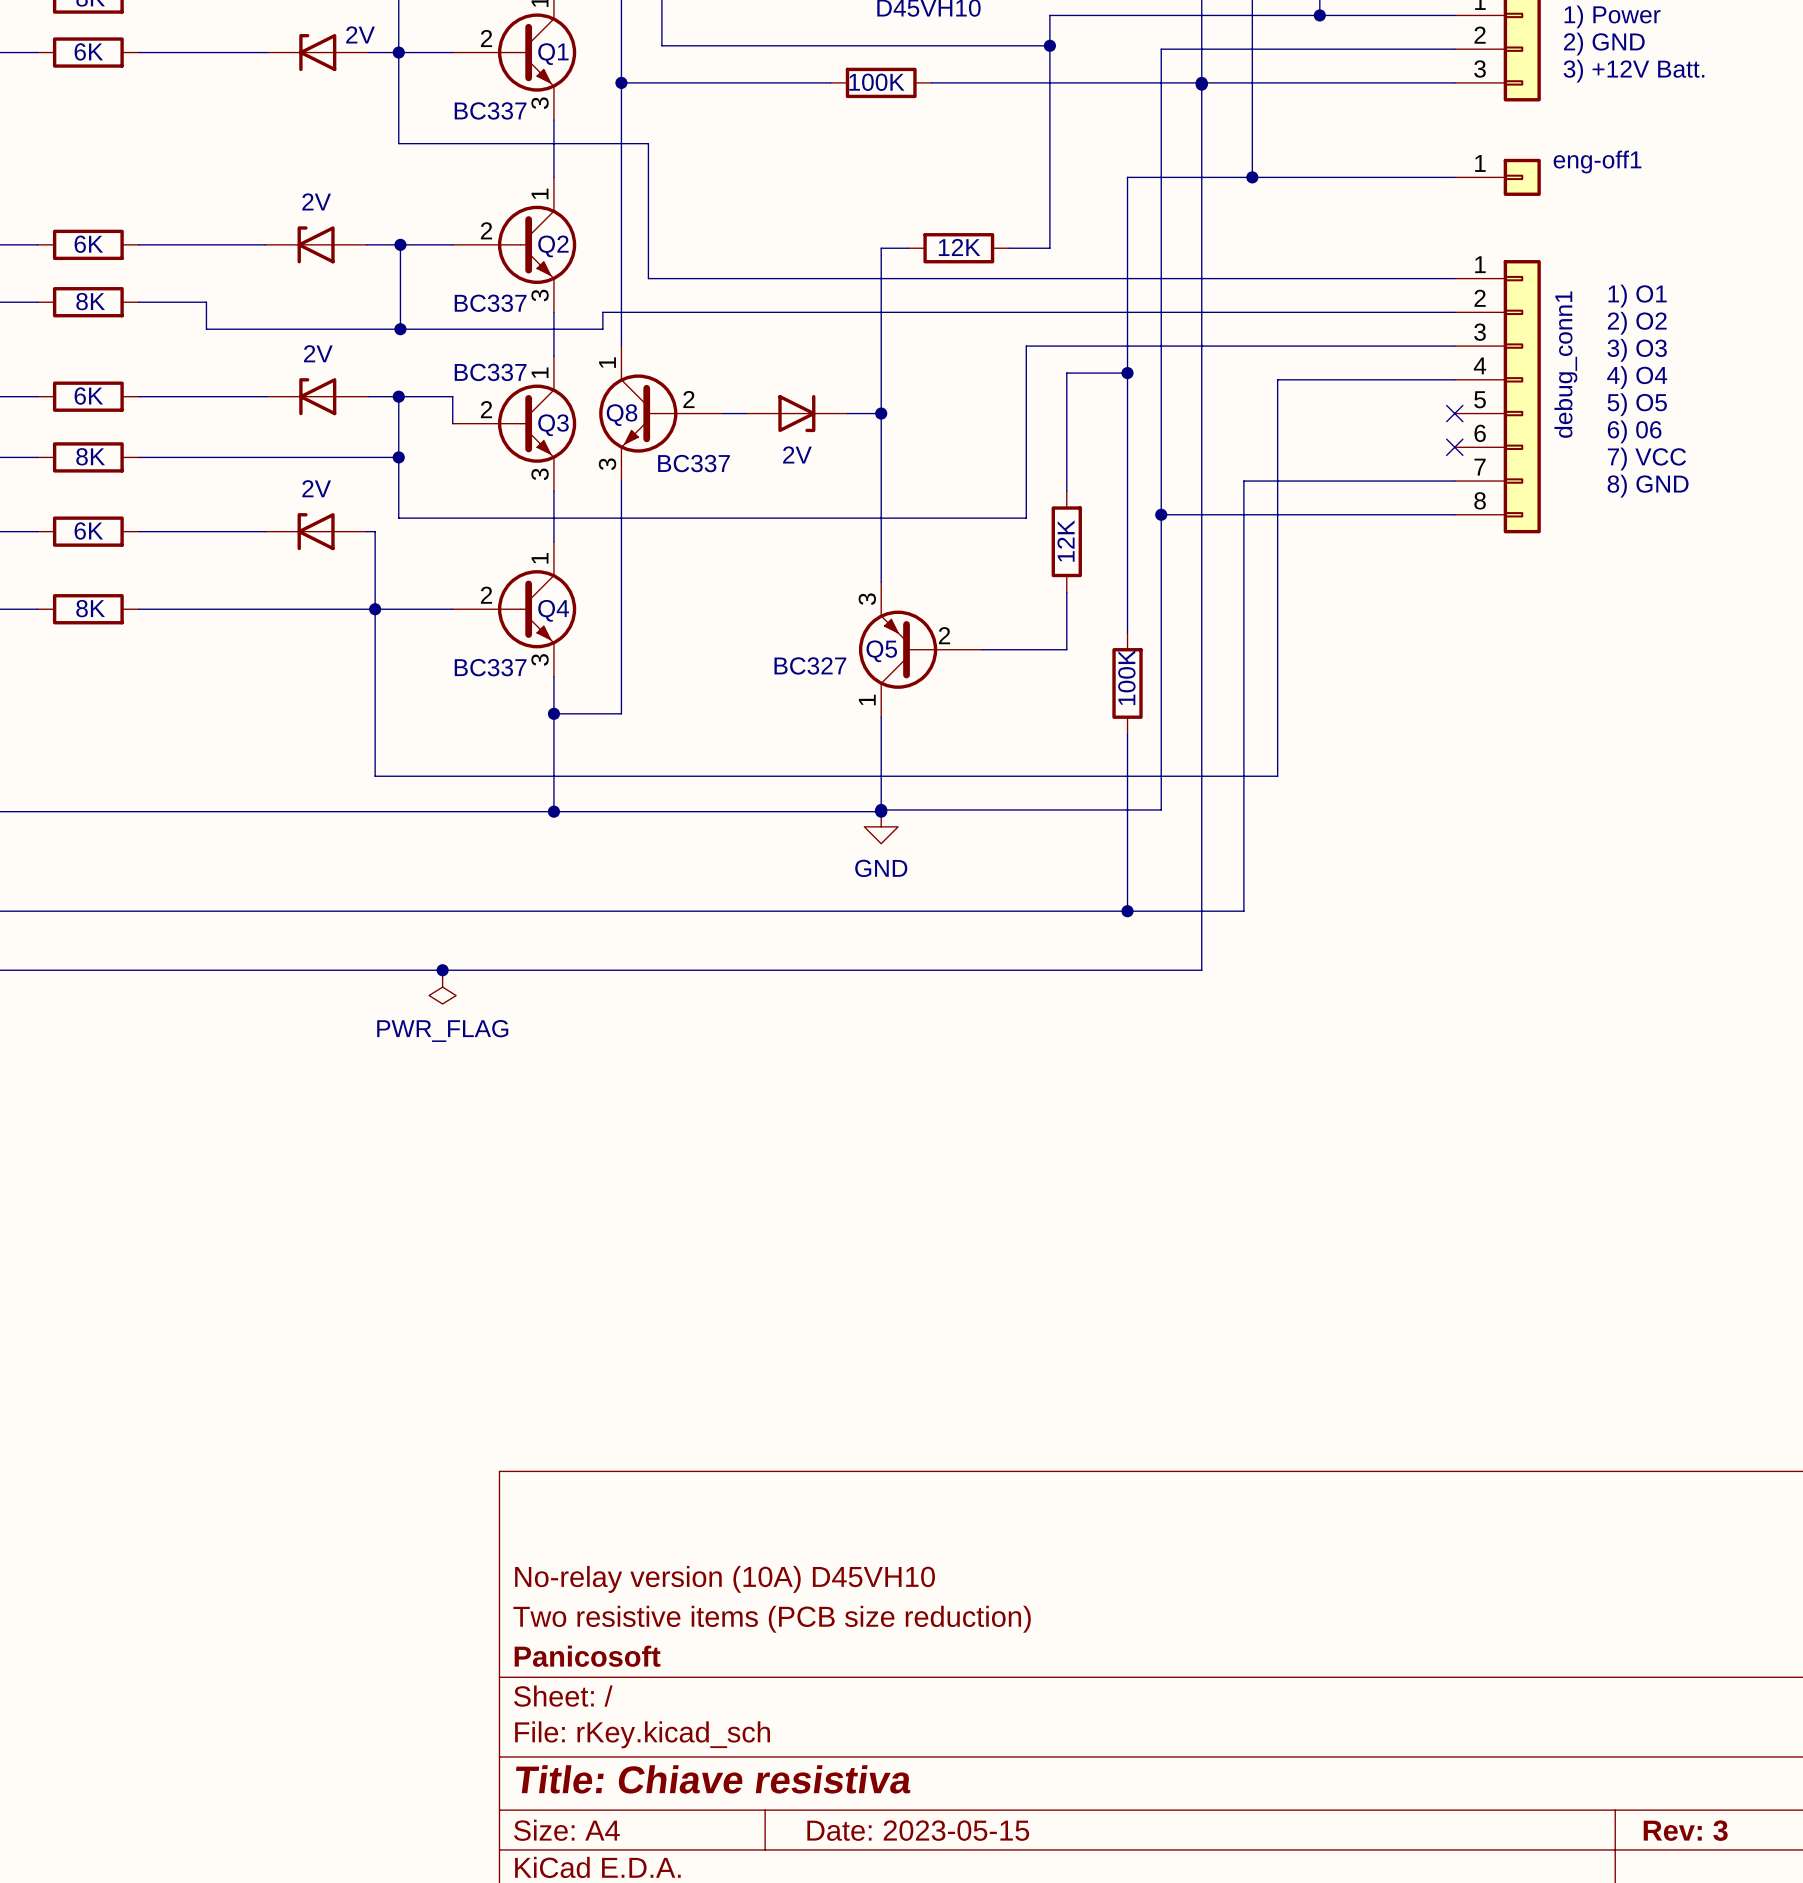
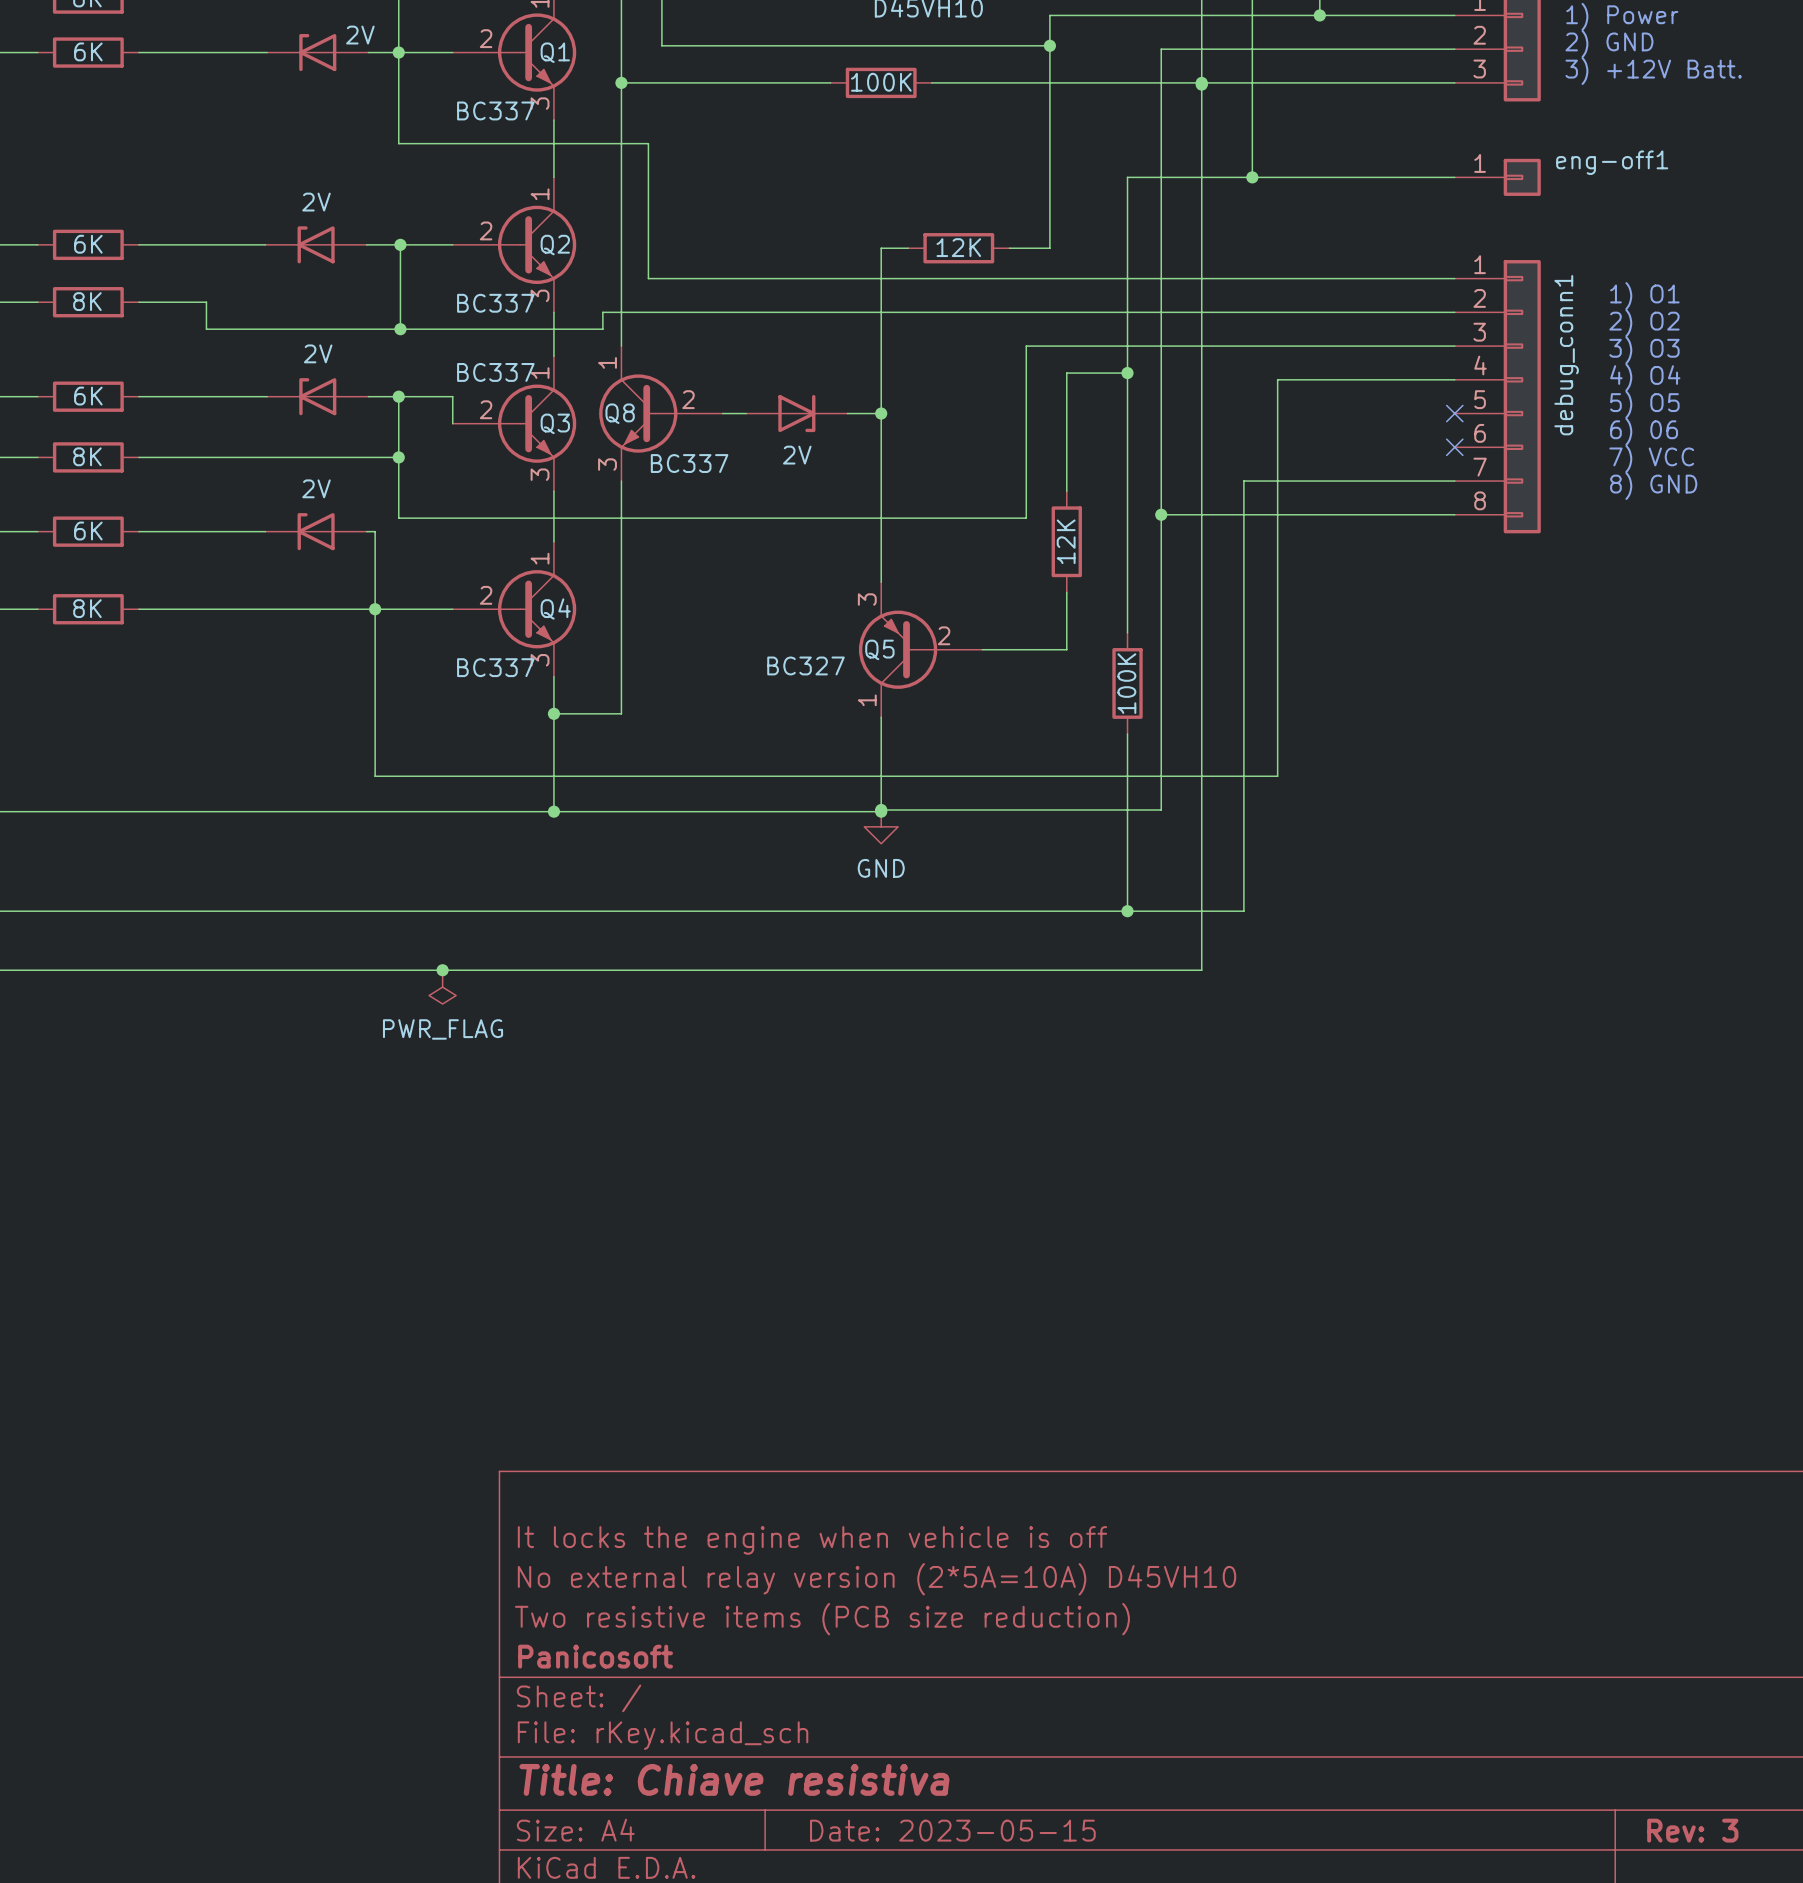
title block: none -> It locks the engine when vehicle is off (812, 1540)
title block: No-relay version (10A) D45VH10 (725, 1579) -> No external relay version (2*5A=10A) D45VH10 (876, 1579)

